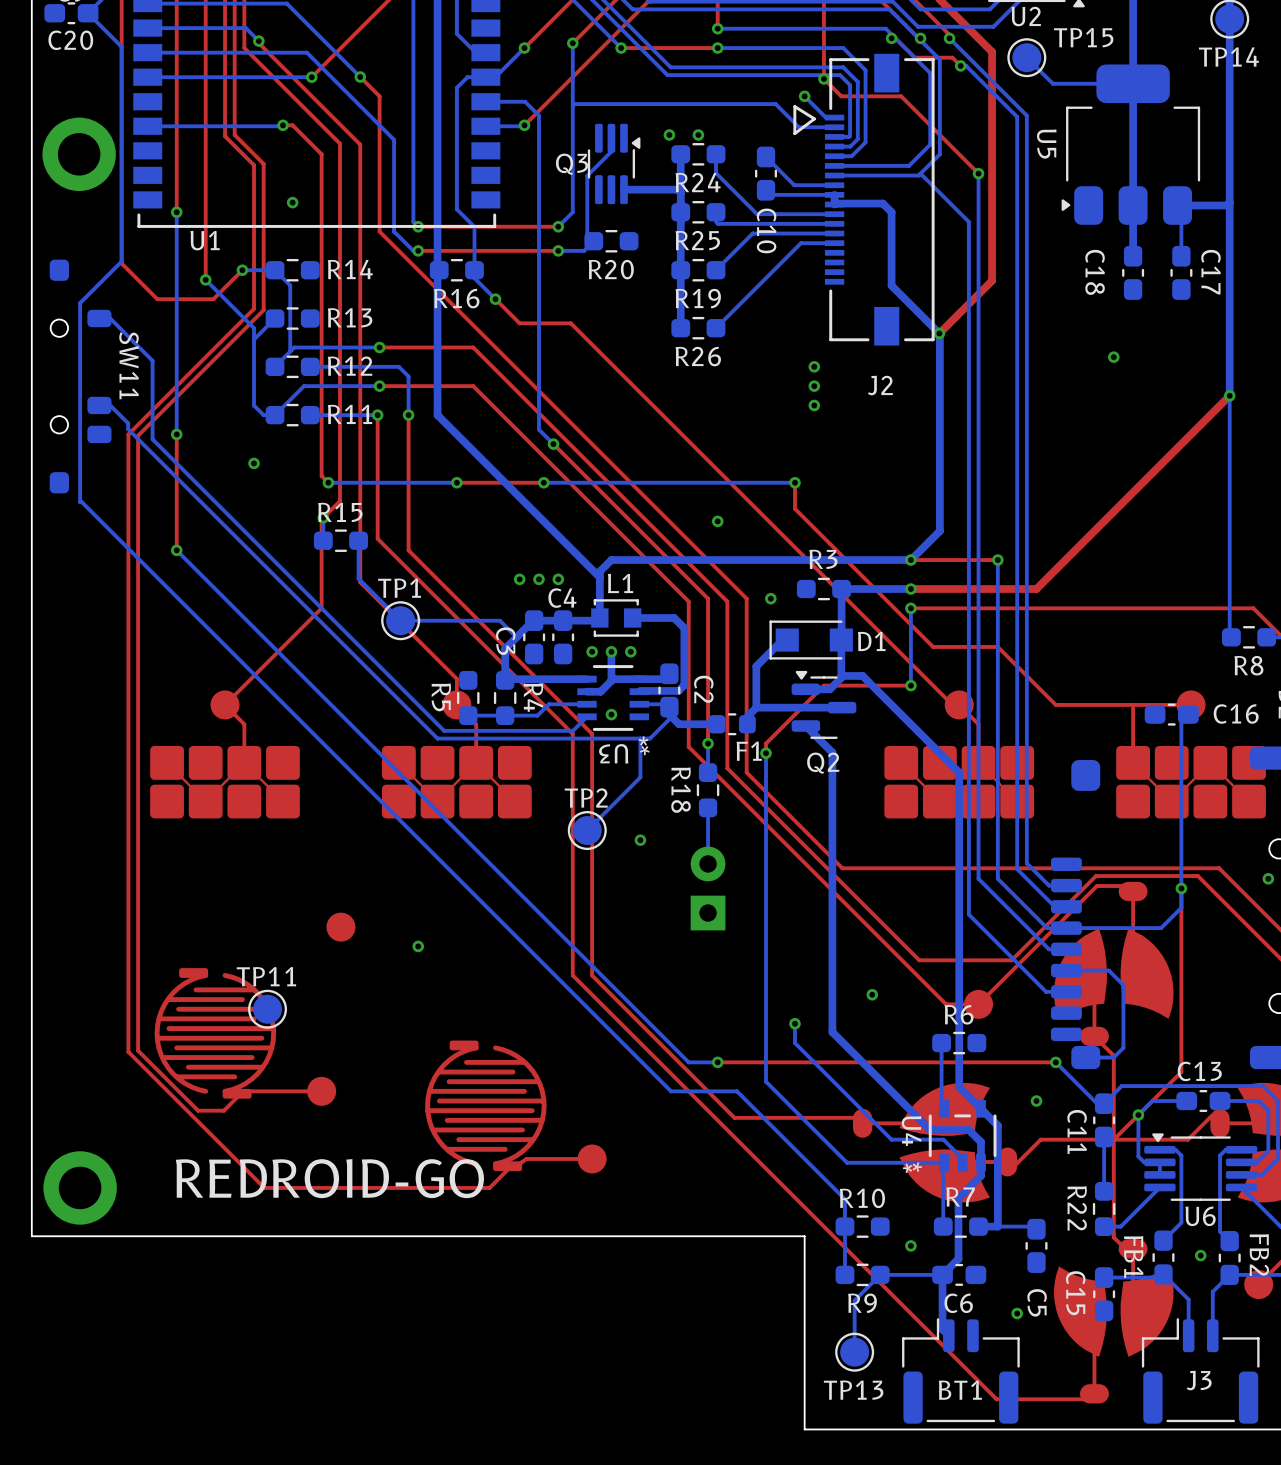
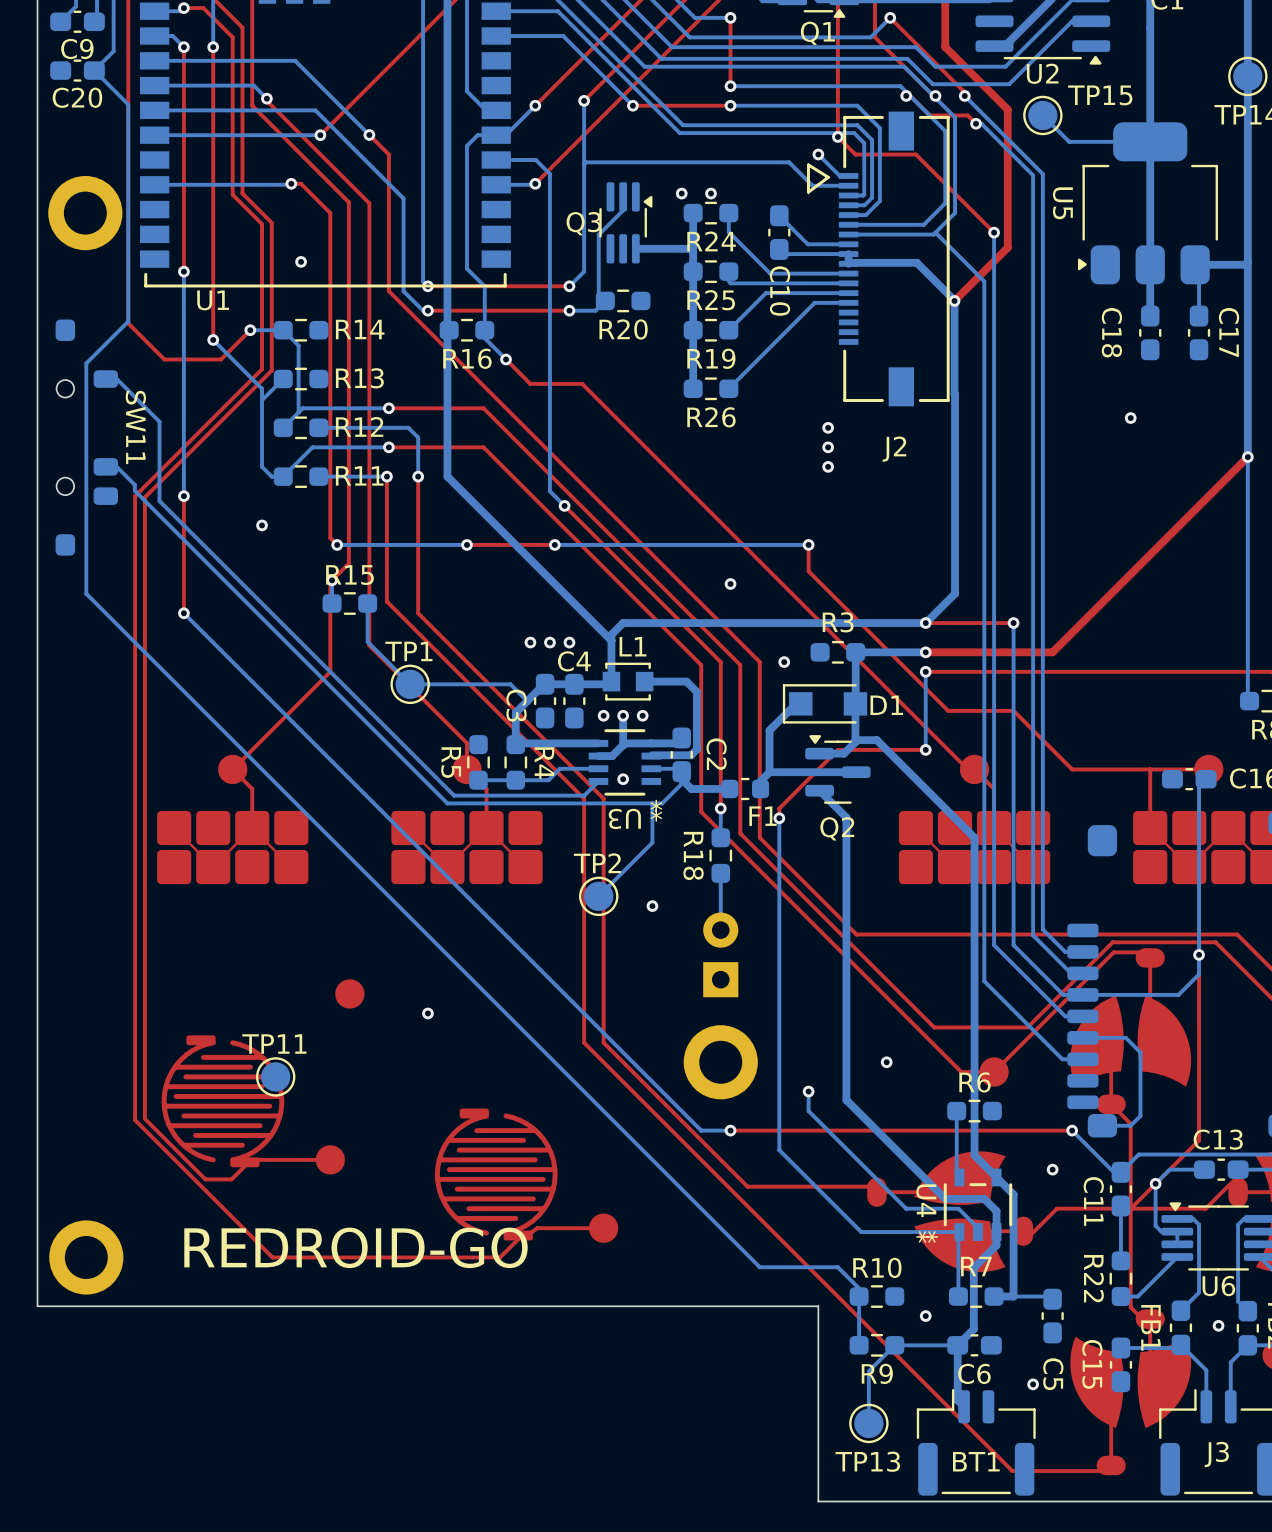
top track: (992, 188) (992, 280) (939, 333) -> (1007, 247) (954, 300)
bottom track: (882, 203) (891, 212) (891, 285) (939, 333) -> (897, 262) (916, 262) (954, 300) (954, 394)
via position: (939, 333) -> (954, 300)
bottom track: (80, 502) (671, 1091) (737, 1091) (844, 1199) (844, 1218) -> (86, 564) (86, 593) (759, 1267) (837, 1267) (859, 1288)
part: none -> (720, 1062)

